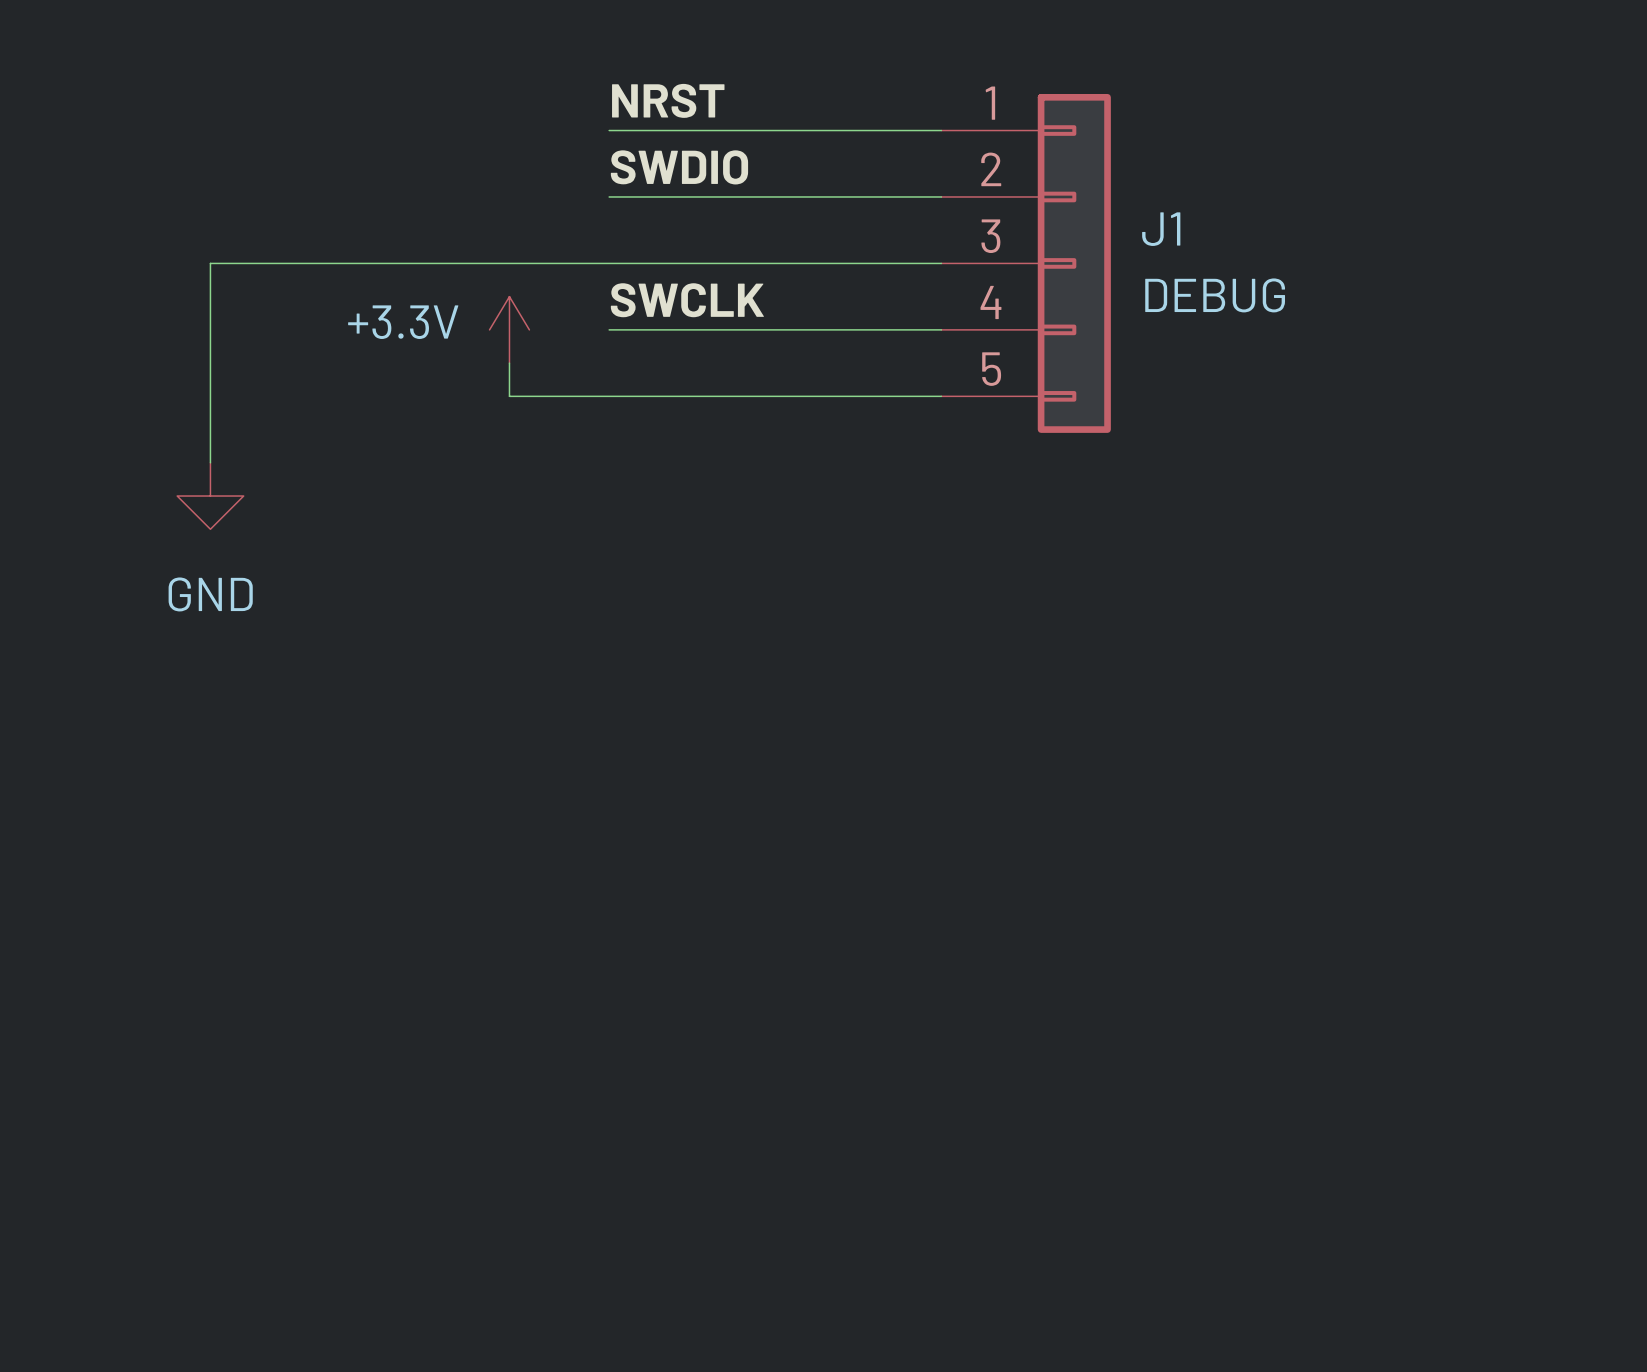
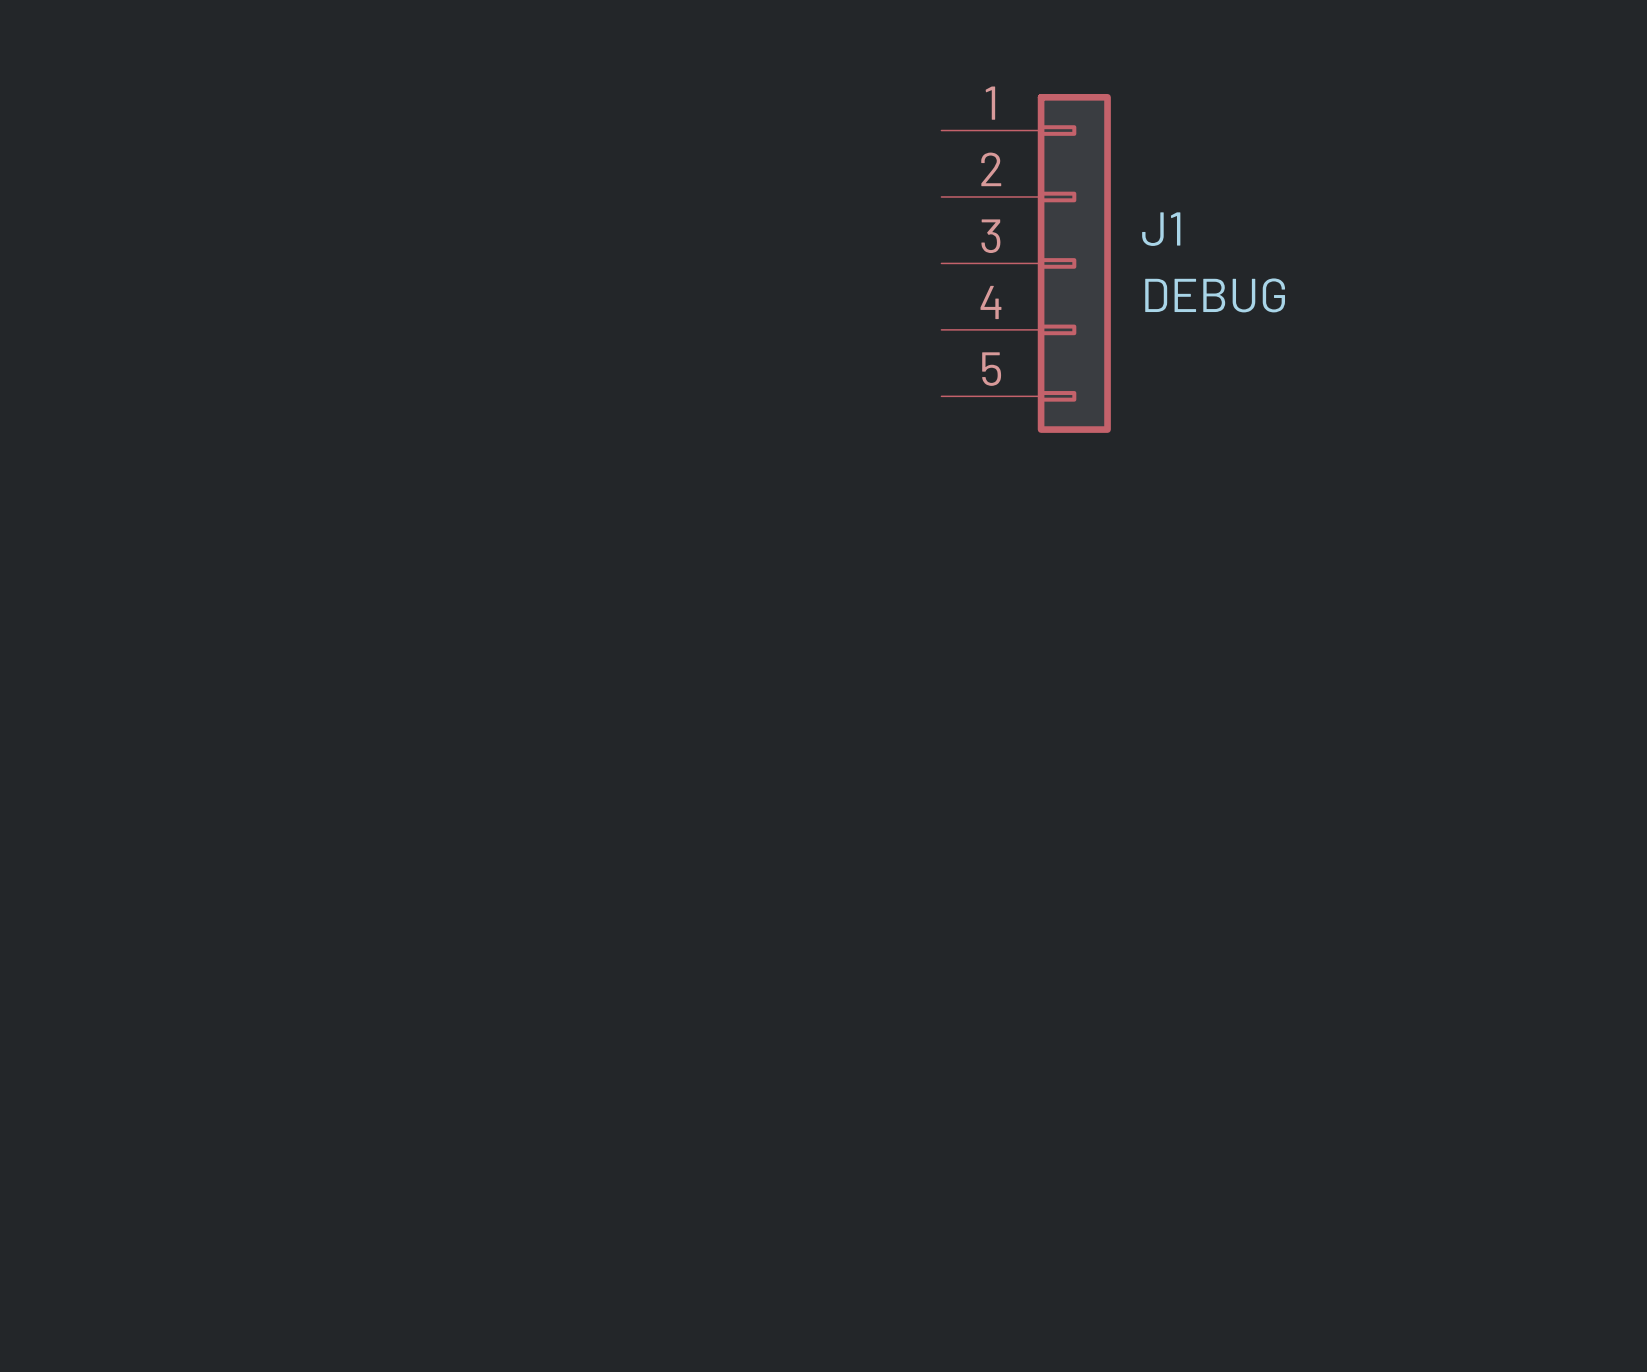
label: NRST (668, 100) -> none
wire: (609, 130) (941, 130) -> none
label: SWDIO (679, 167) -> none
wire: (609, 196) (941, 196) -> none
wire: (941, 263) (210, 263) (210, 462) -> none
label: SWCLK (687, 300) -> none
power symbol: +3.3V (509, 329) -> none
wire: (609, 329) (941, 329) -> none
wire: (509, 363) (509, 396) (941, 396) -> none
power symbol: GND (210, 496) -> none

